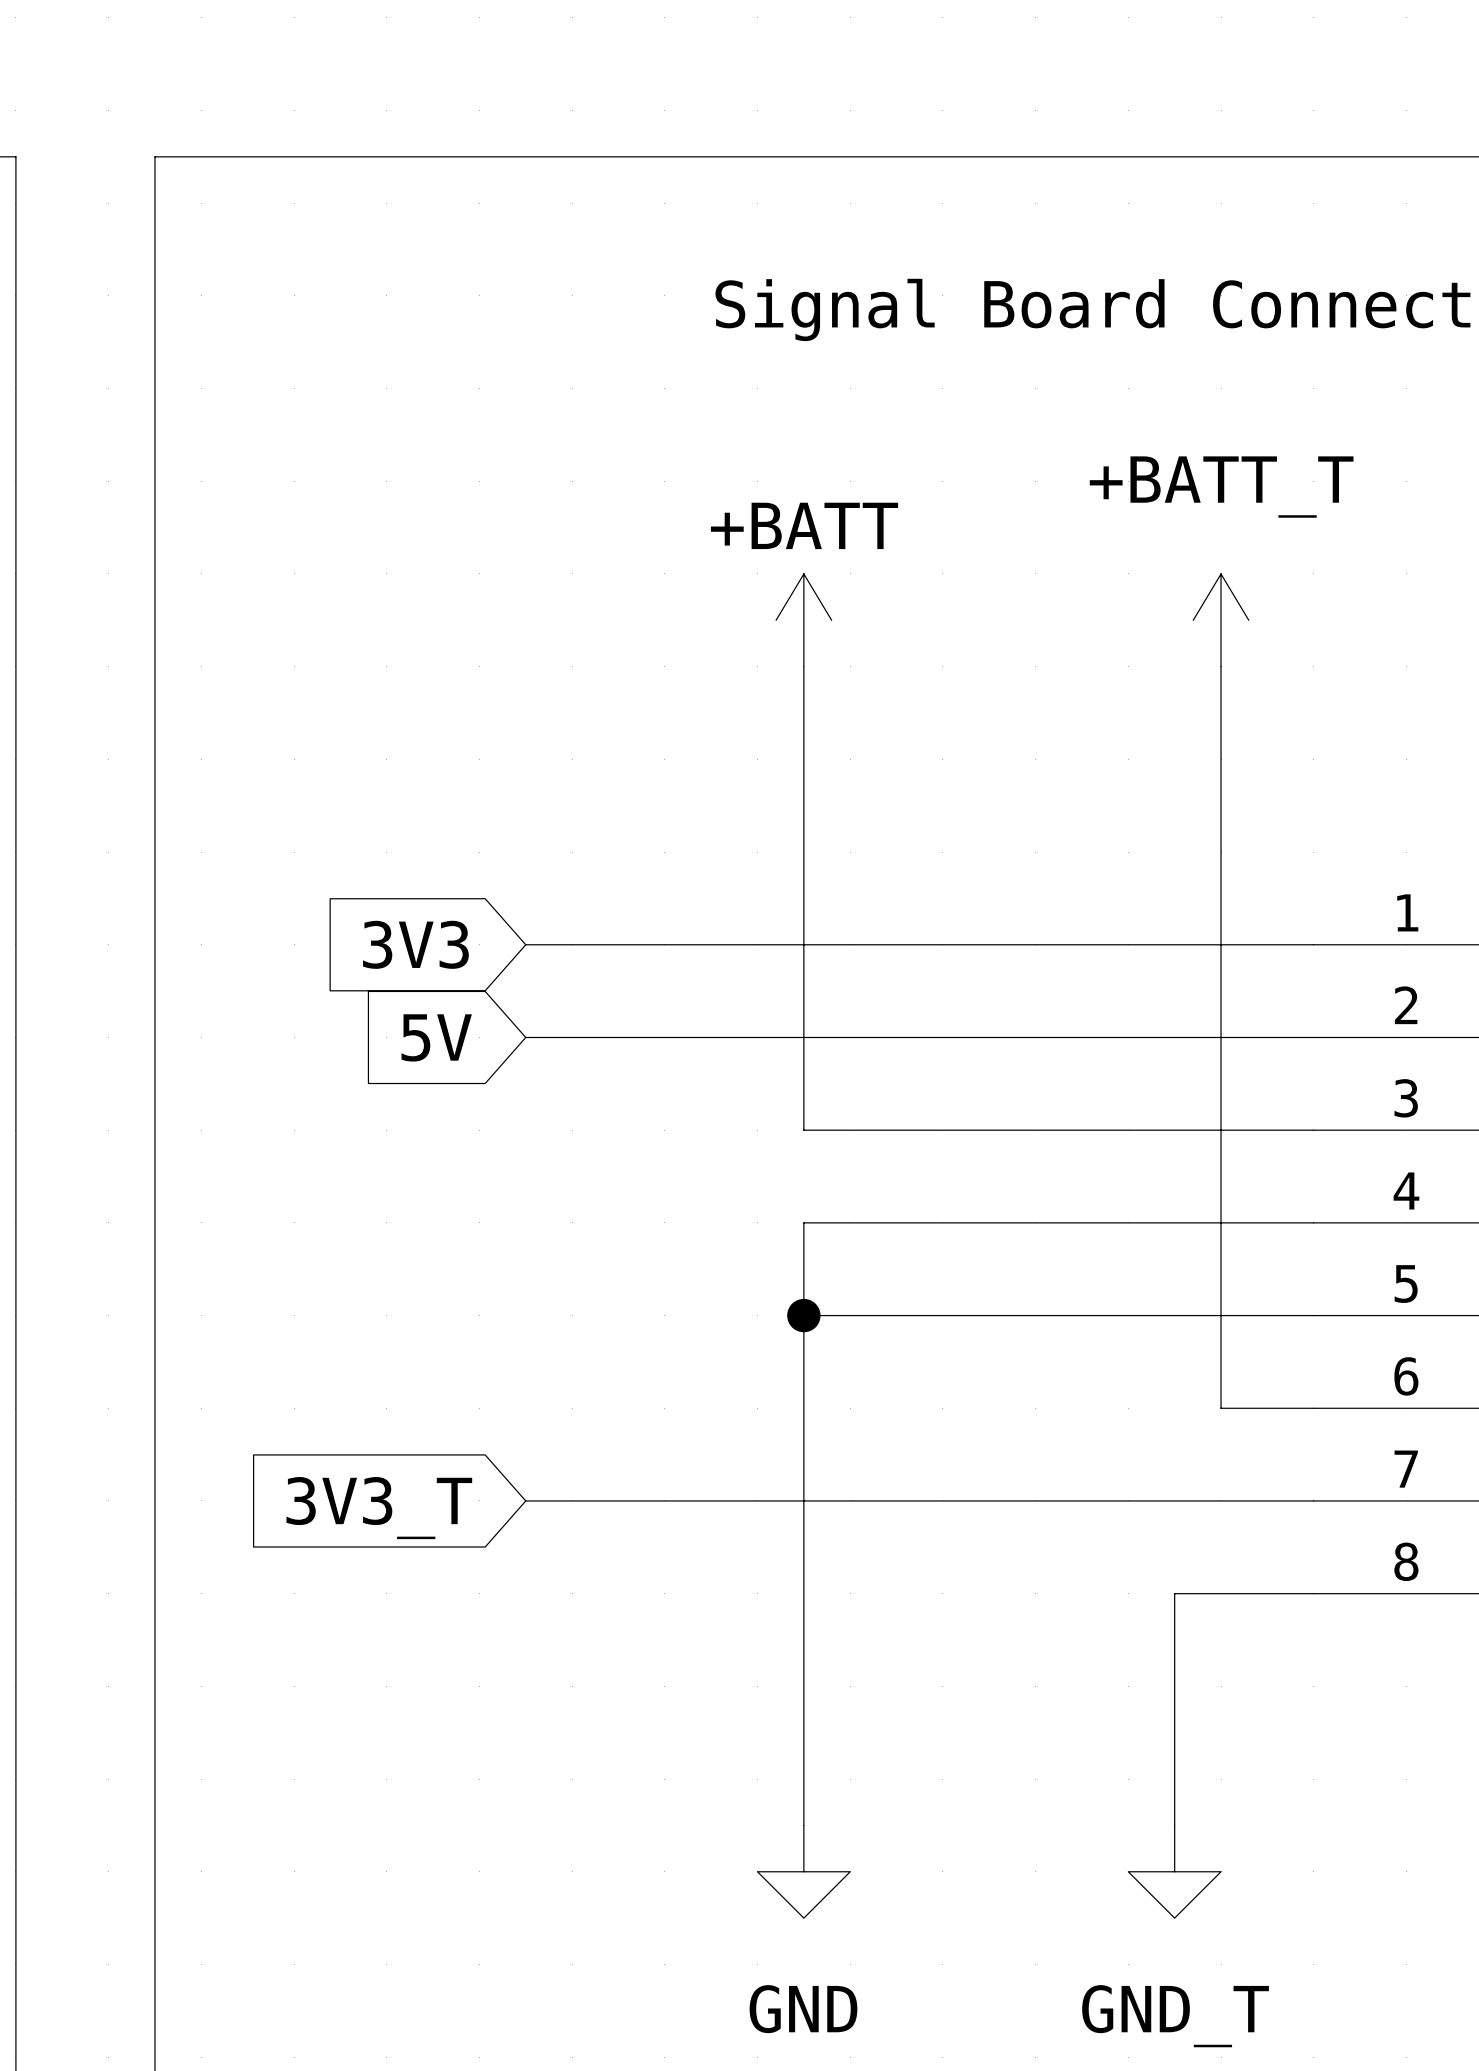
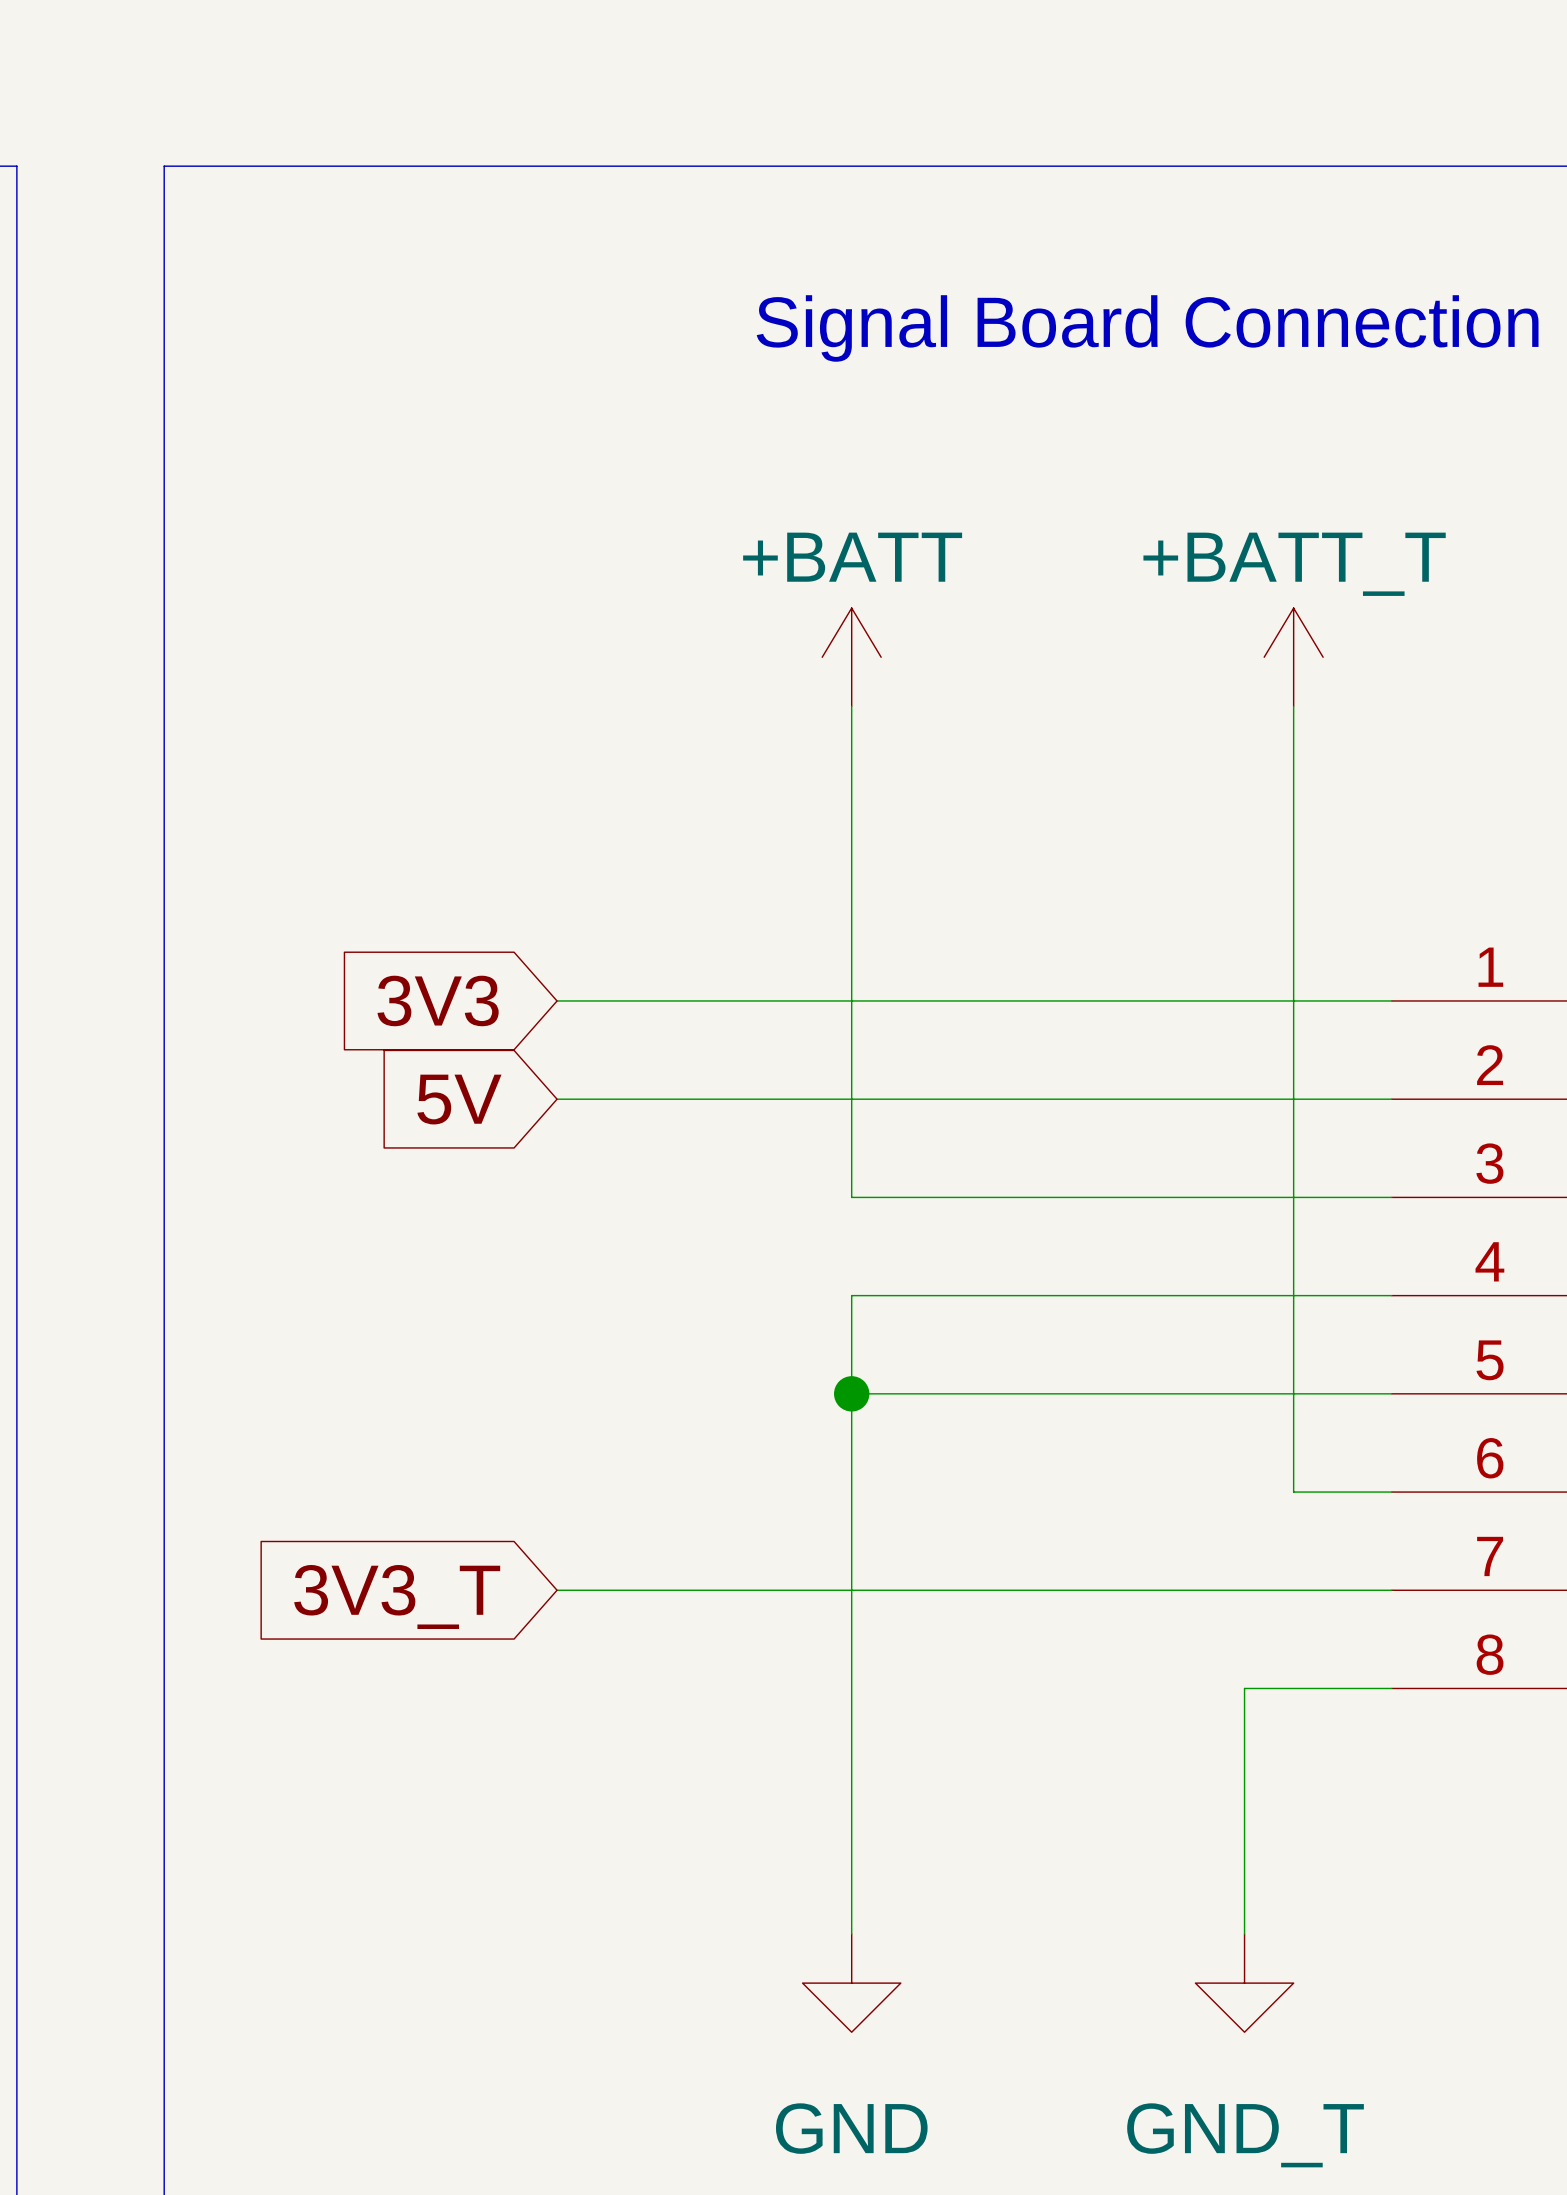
power symbol text position: +BATT_T (1221, 487) -> +BATT_T (1294, 564)

